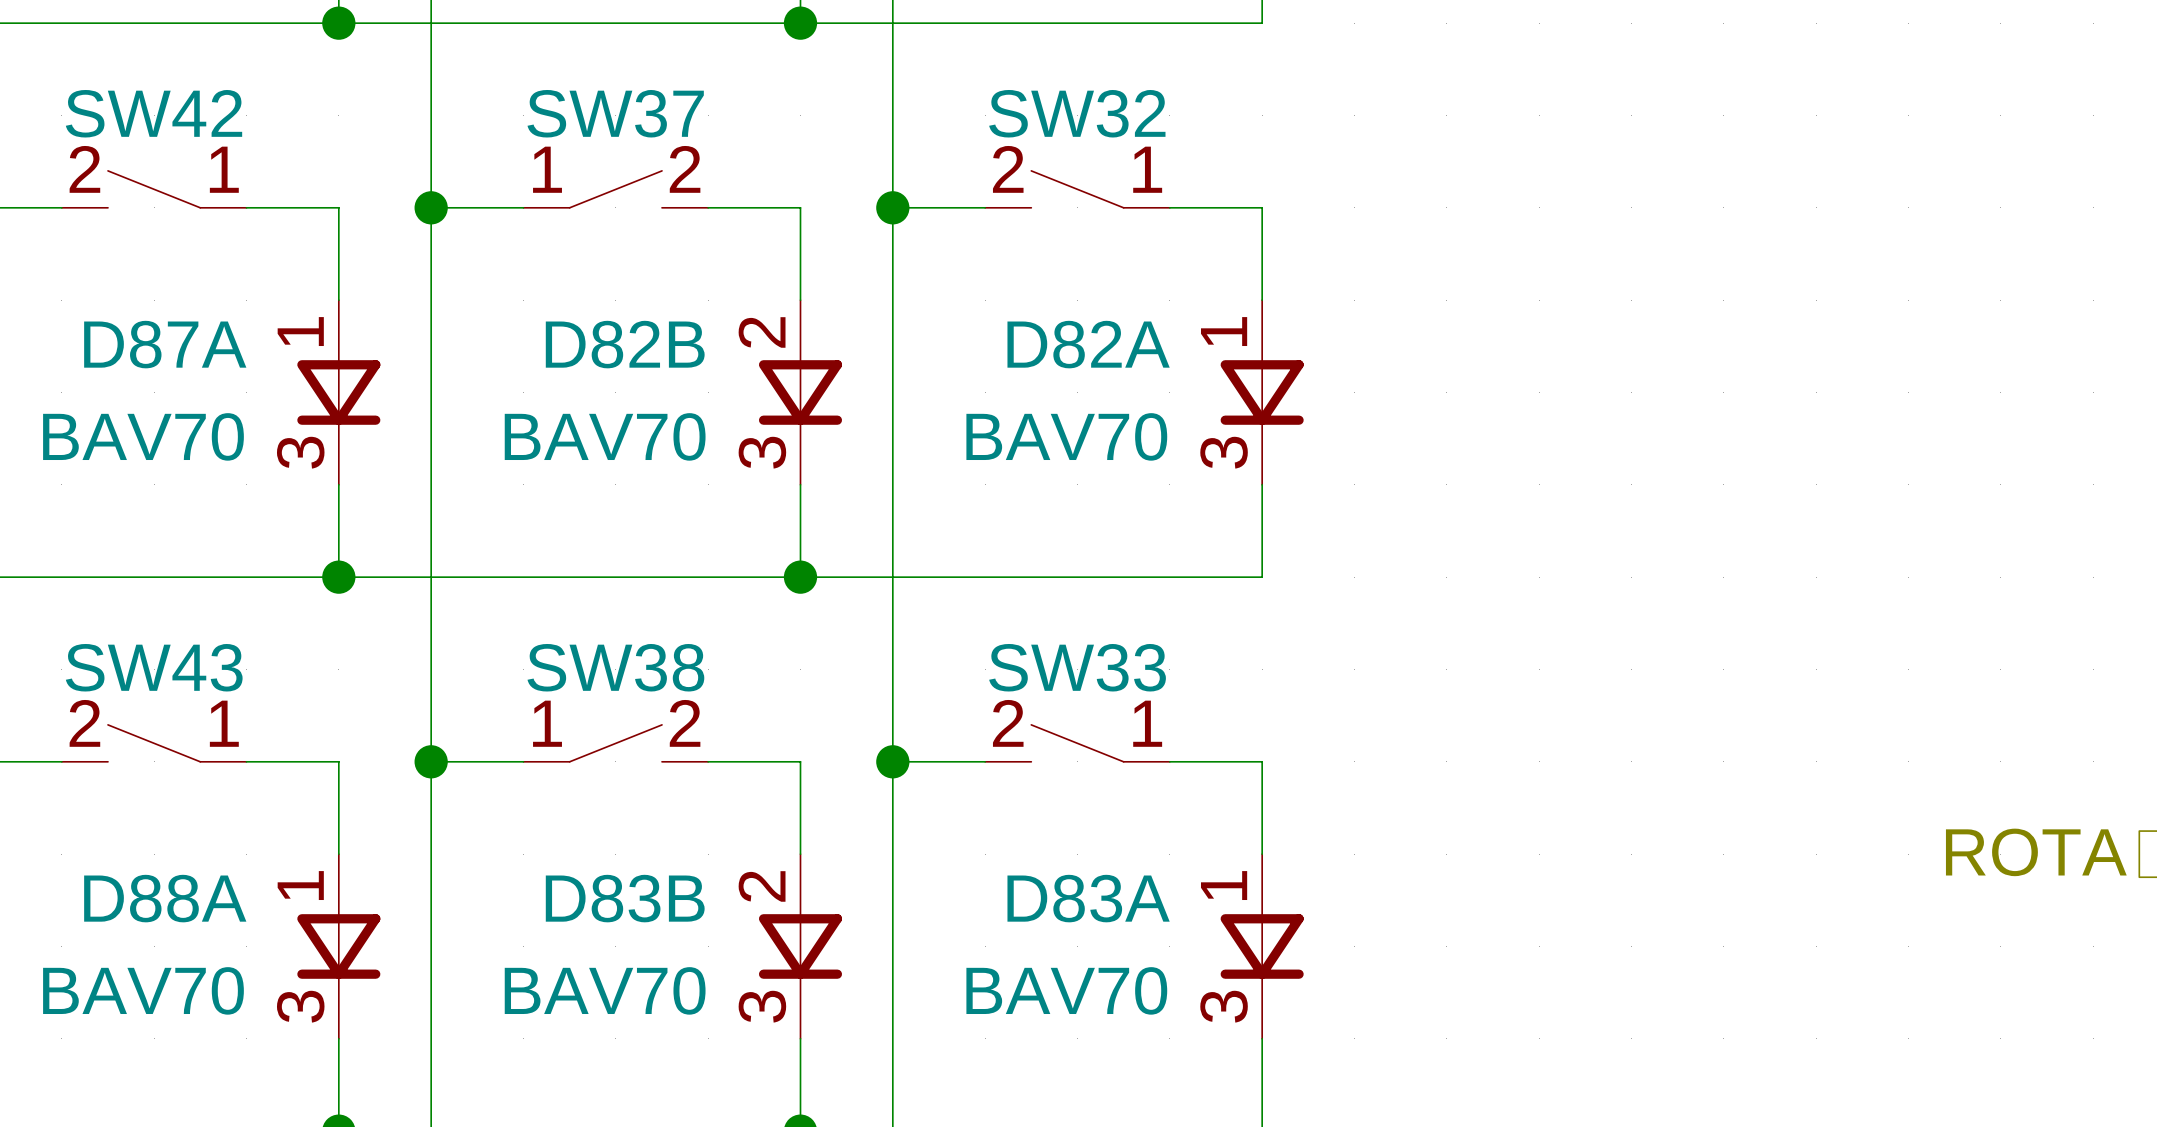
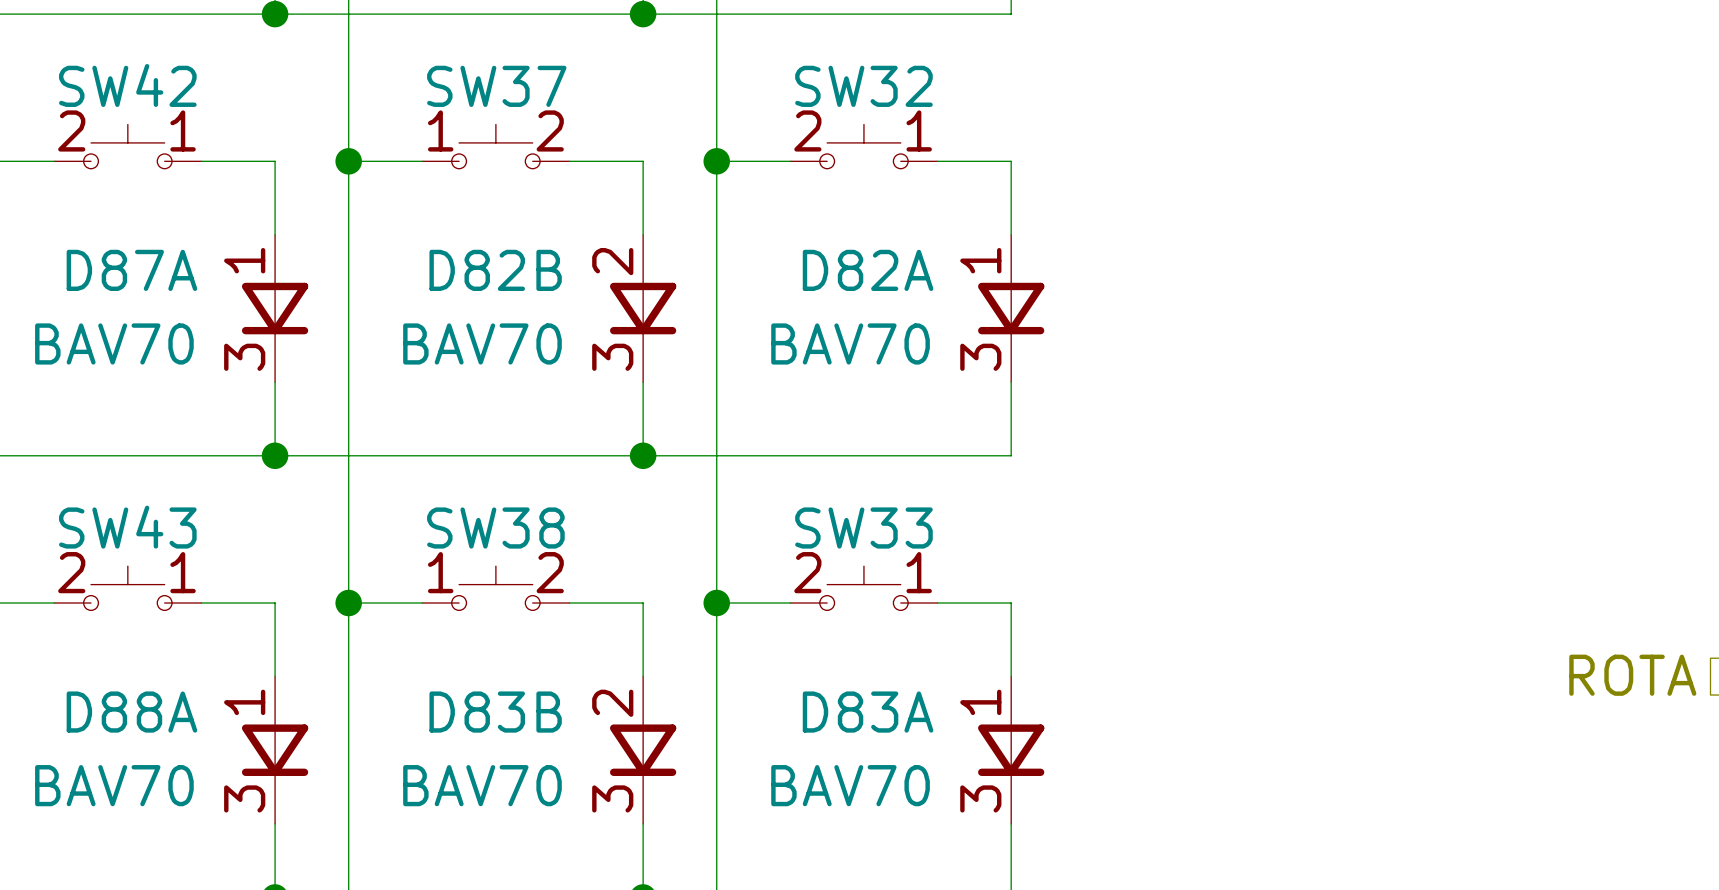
SW42 symbol: [61, 170, 247, 208] -> [54, 124, 202, 169]
SW37 symbol: [523, 170, 709, 208] -> [422, 124, 570, 169]
SW32 symbol: [985, 170, 1170, 208] -> [790, 124, 938, 169]
SW43 symbol: [61, 724, 247, 762] -> [54, 566, 202, 611]
SW38 symbol: [523, 724, 709, 762] -> [422, 566, 570, 611]
SW33 symbol: [985, 724, 1170, 762] -> [790, 566, 938, 611]

